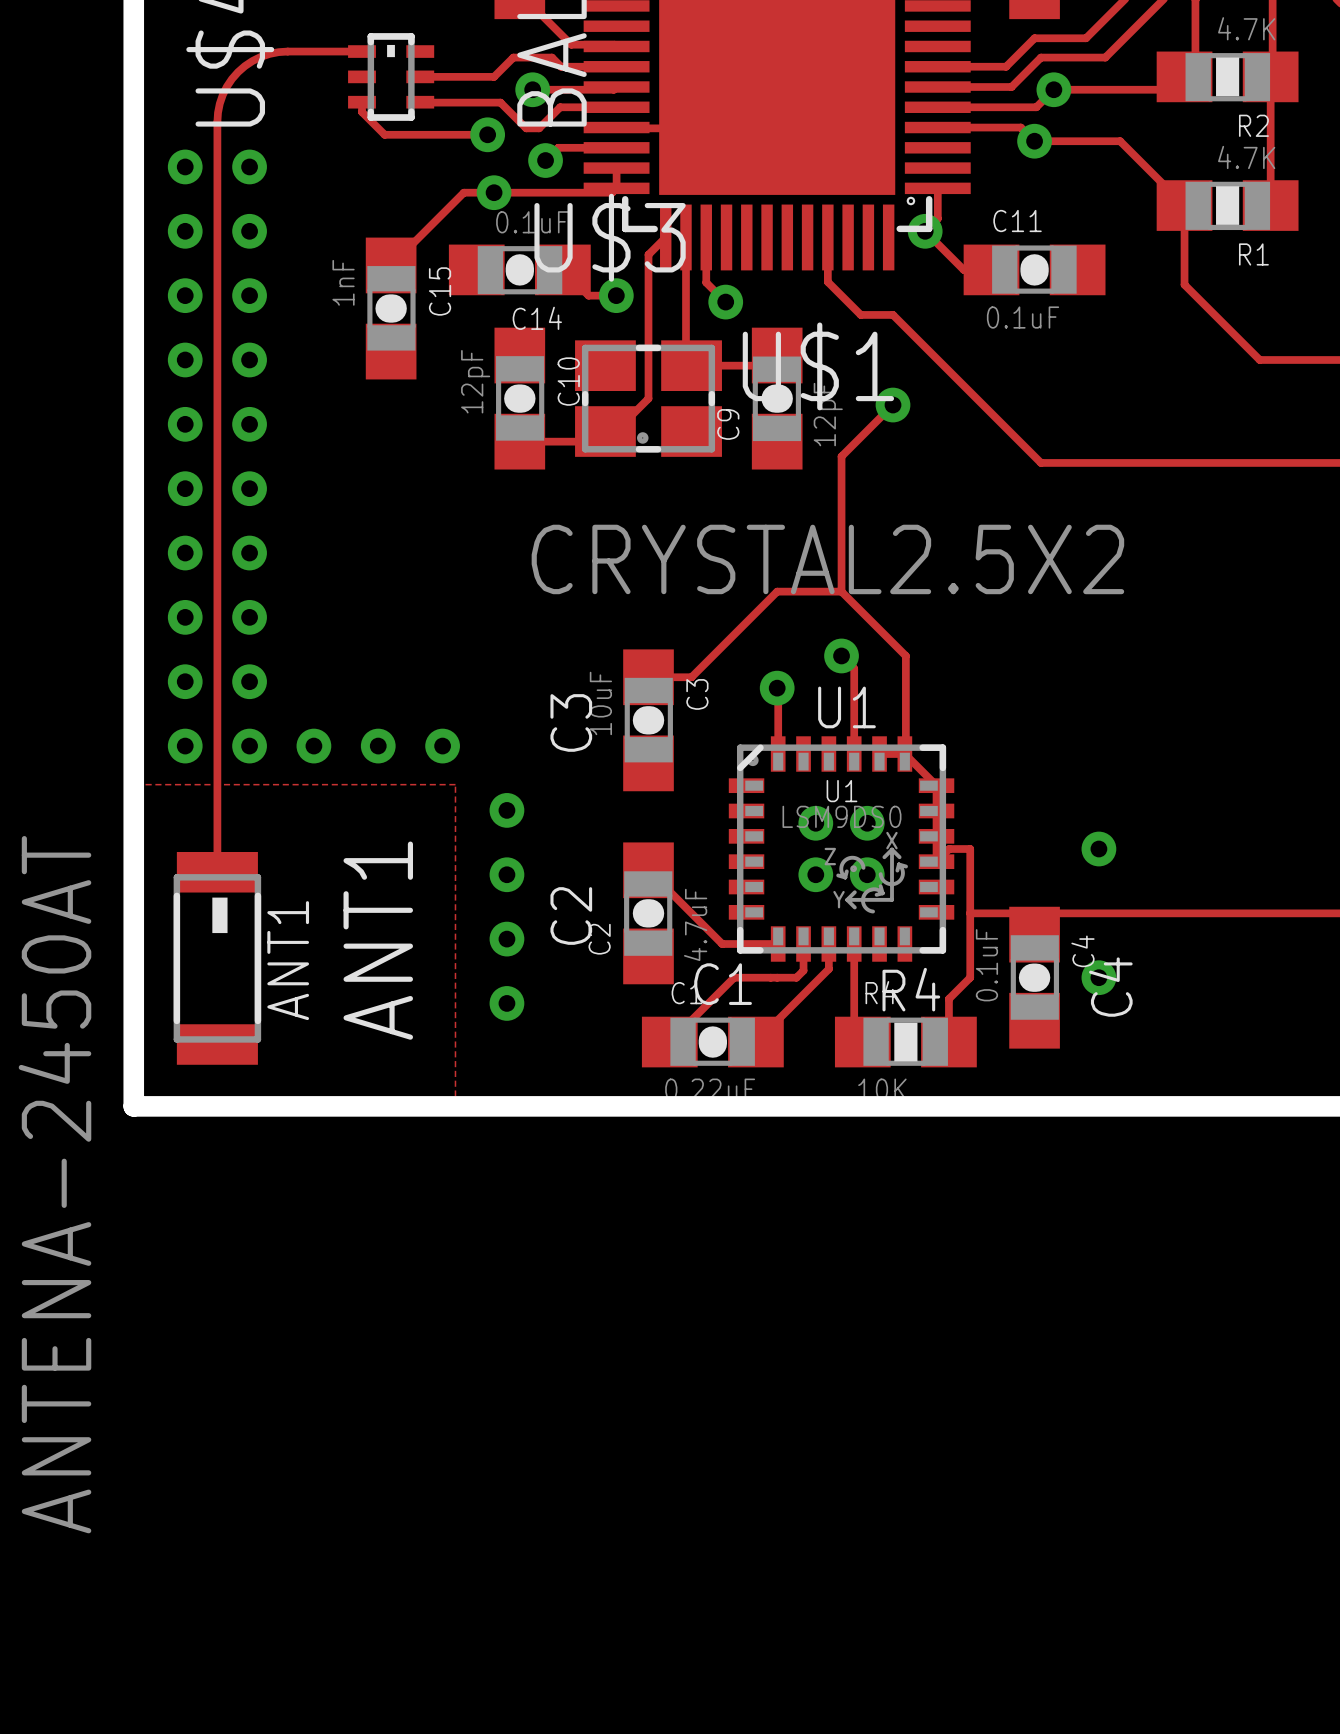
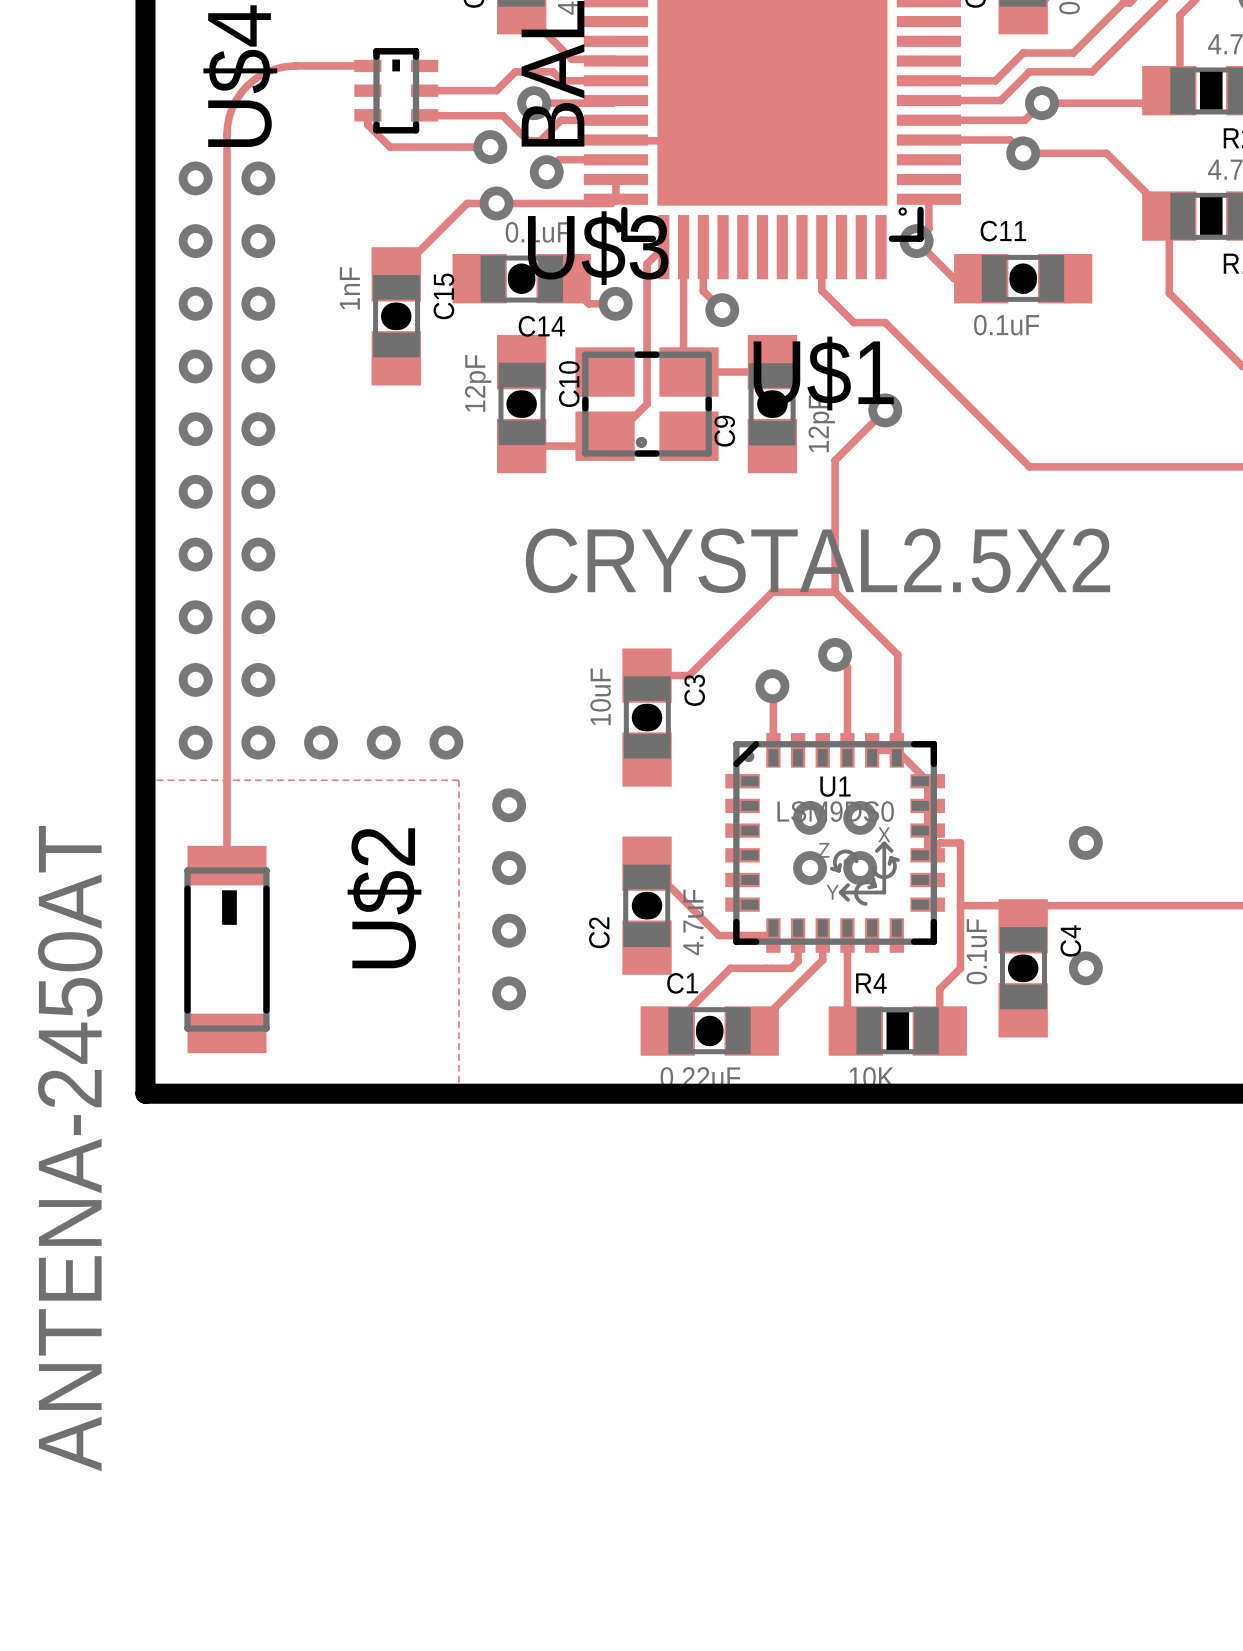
text: U1 (846, 707) -> none
text: C3 (571, 722) -> none
text: C2 (571, 916) -> none
ANT1 name: ANT1 (378, 940) -> U$2 (384, 898)
text: ANT1 (288, 960) -> none
text: C1 (723, 984) -> none
text: C4 (1110, 987) -> none
text: R4 (911, 989) -> none

